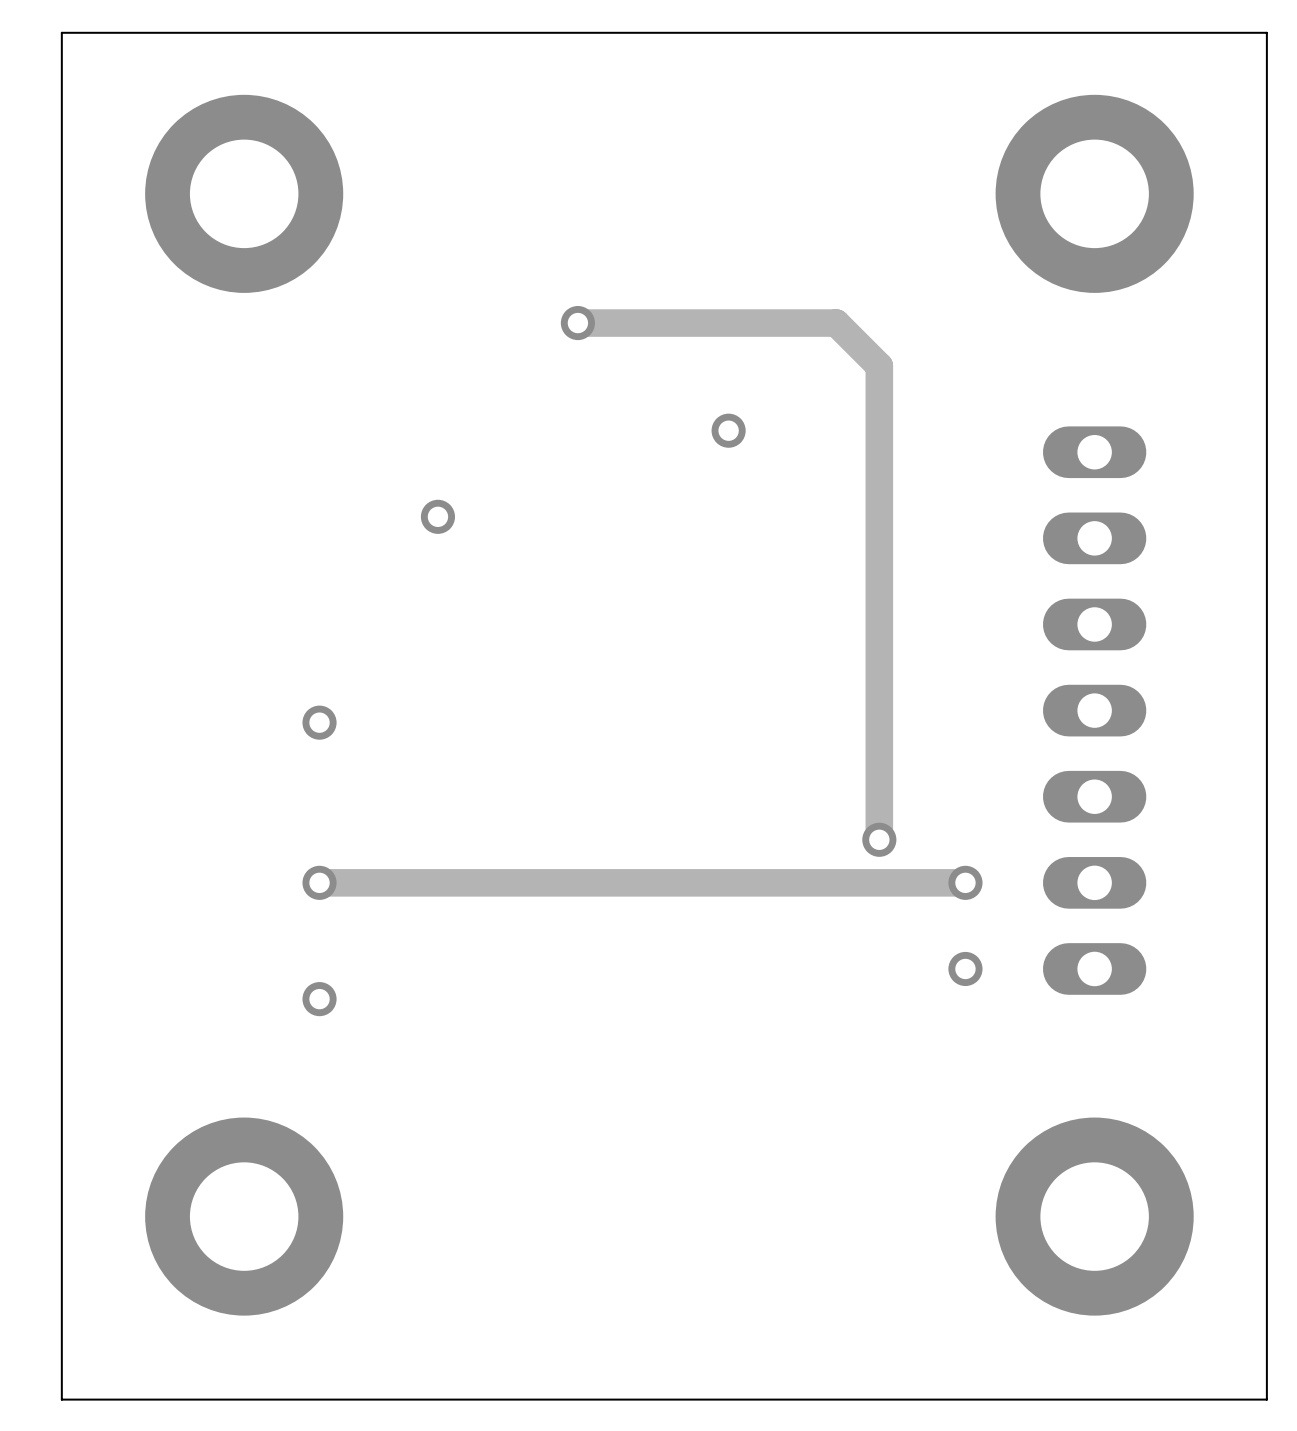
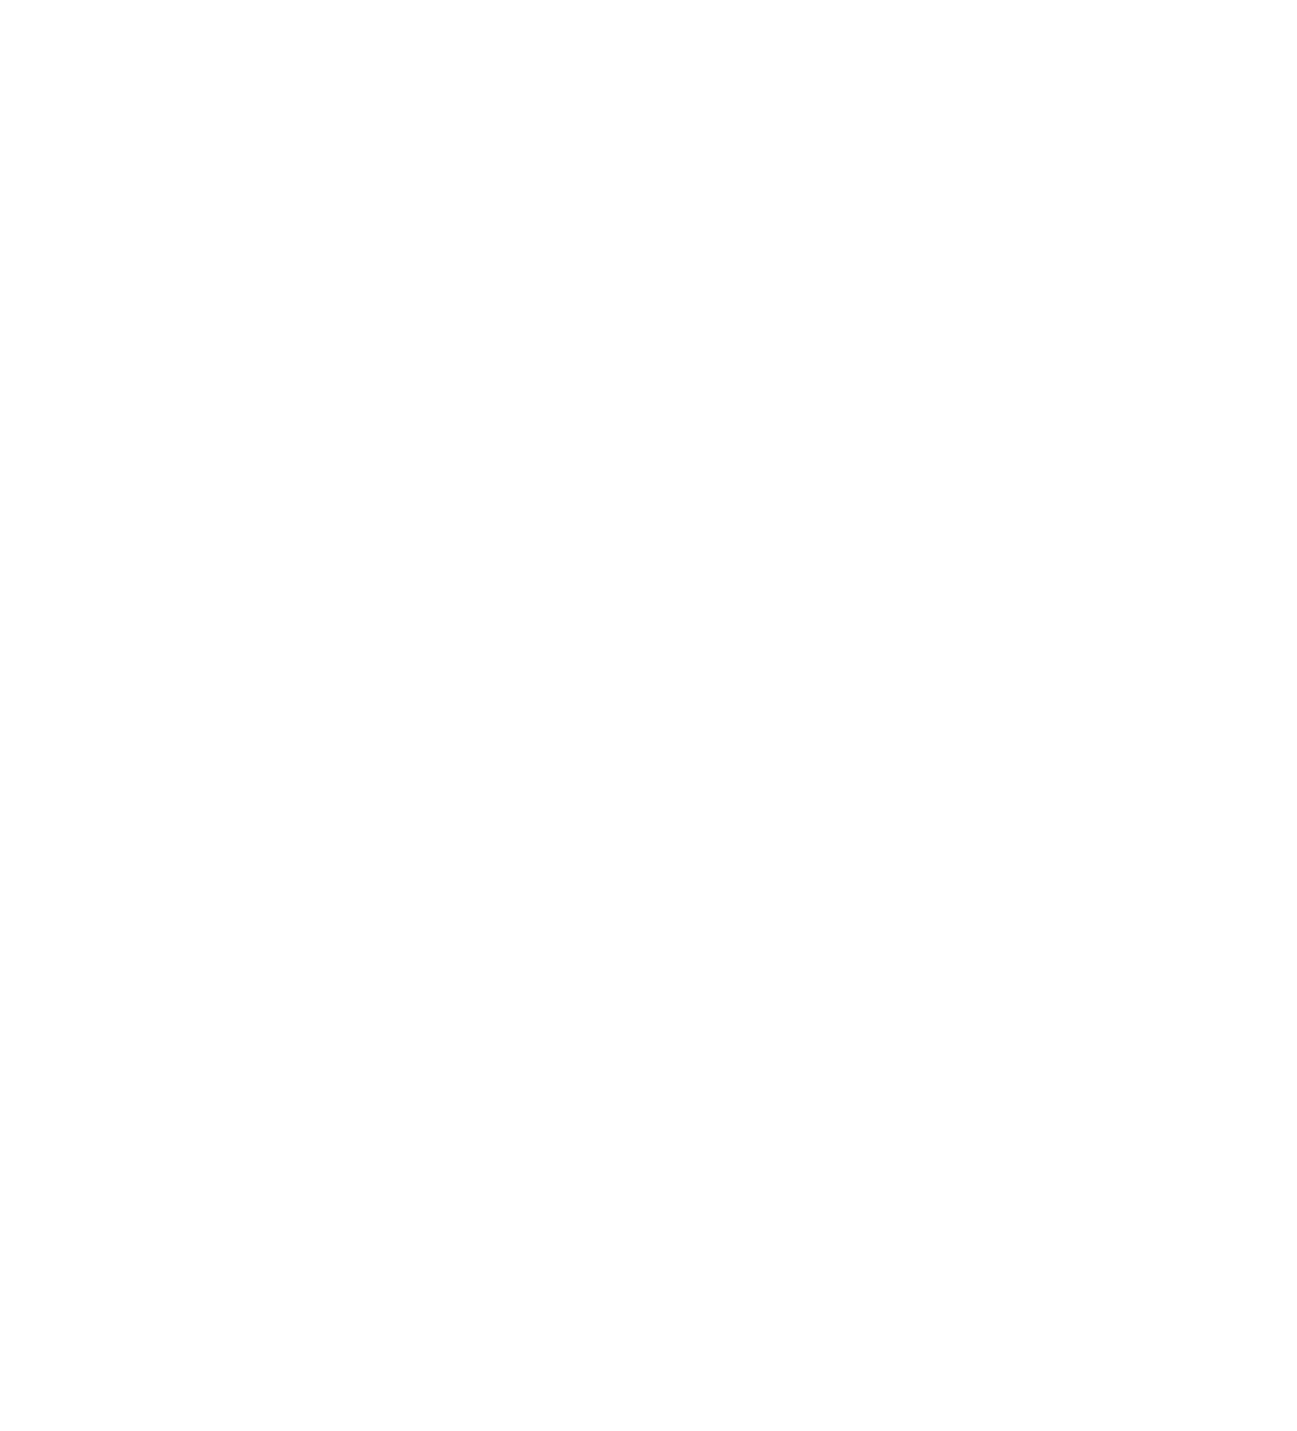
board edge: (1266, 32) (61, 32) (61, 1399) (1266, 1399) (1266, 32) -> none
part: (244, 193) -> none
part: (1094, 193) -> none
track: (577, 323) (836, 323) (879, 366) (879, 839) -> none
via: (577, 323) -> none
via: (728, 430) -> none
via: (437, 516) -> none
part: (1094, 710) -> none
via: (319, 722) -> none
via: (879, 839) -> none
via: (319, 882) -> none
track: (965, 882) (319, 882) -> none
via: (965, 882) -> none
via: (965, 968) -> none
via: (319, 999) -> none
part: (244, 1216) -> none
part: (1094, 1216) -> none

